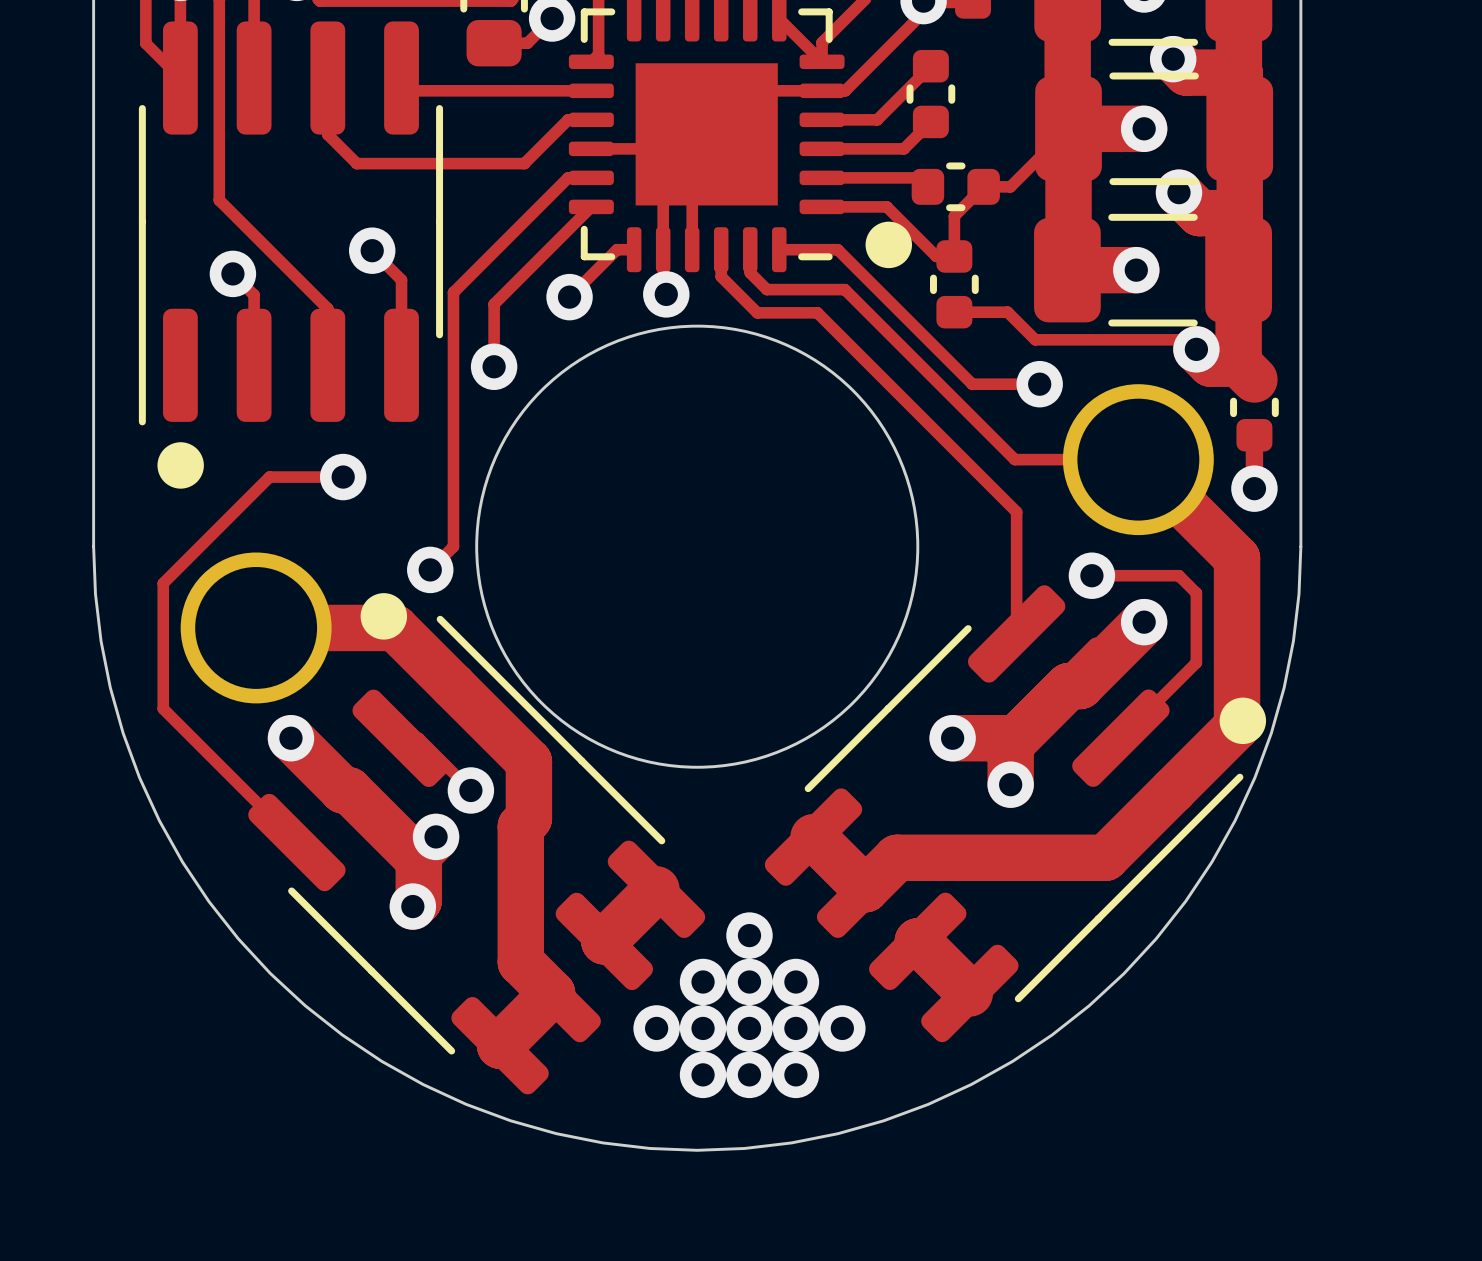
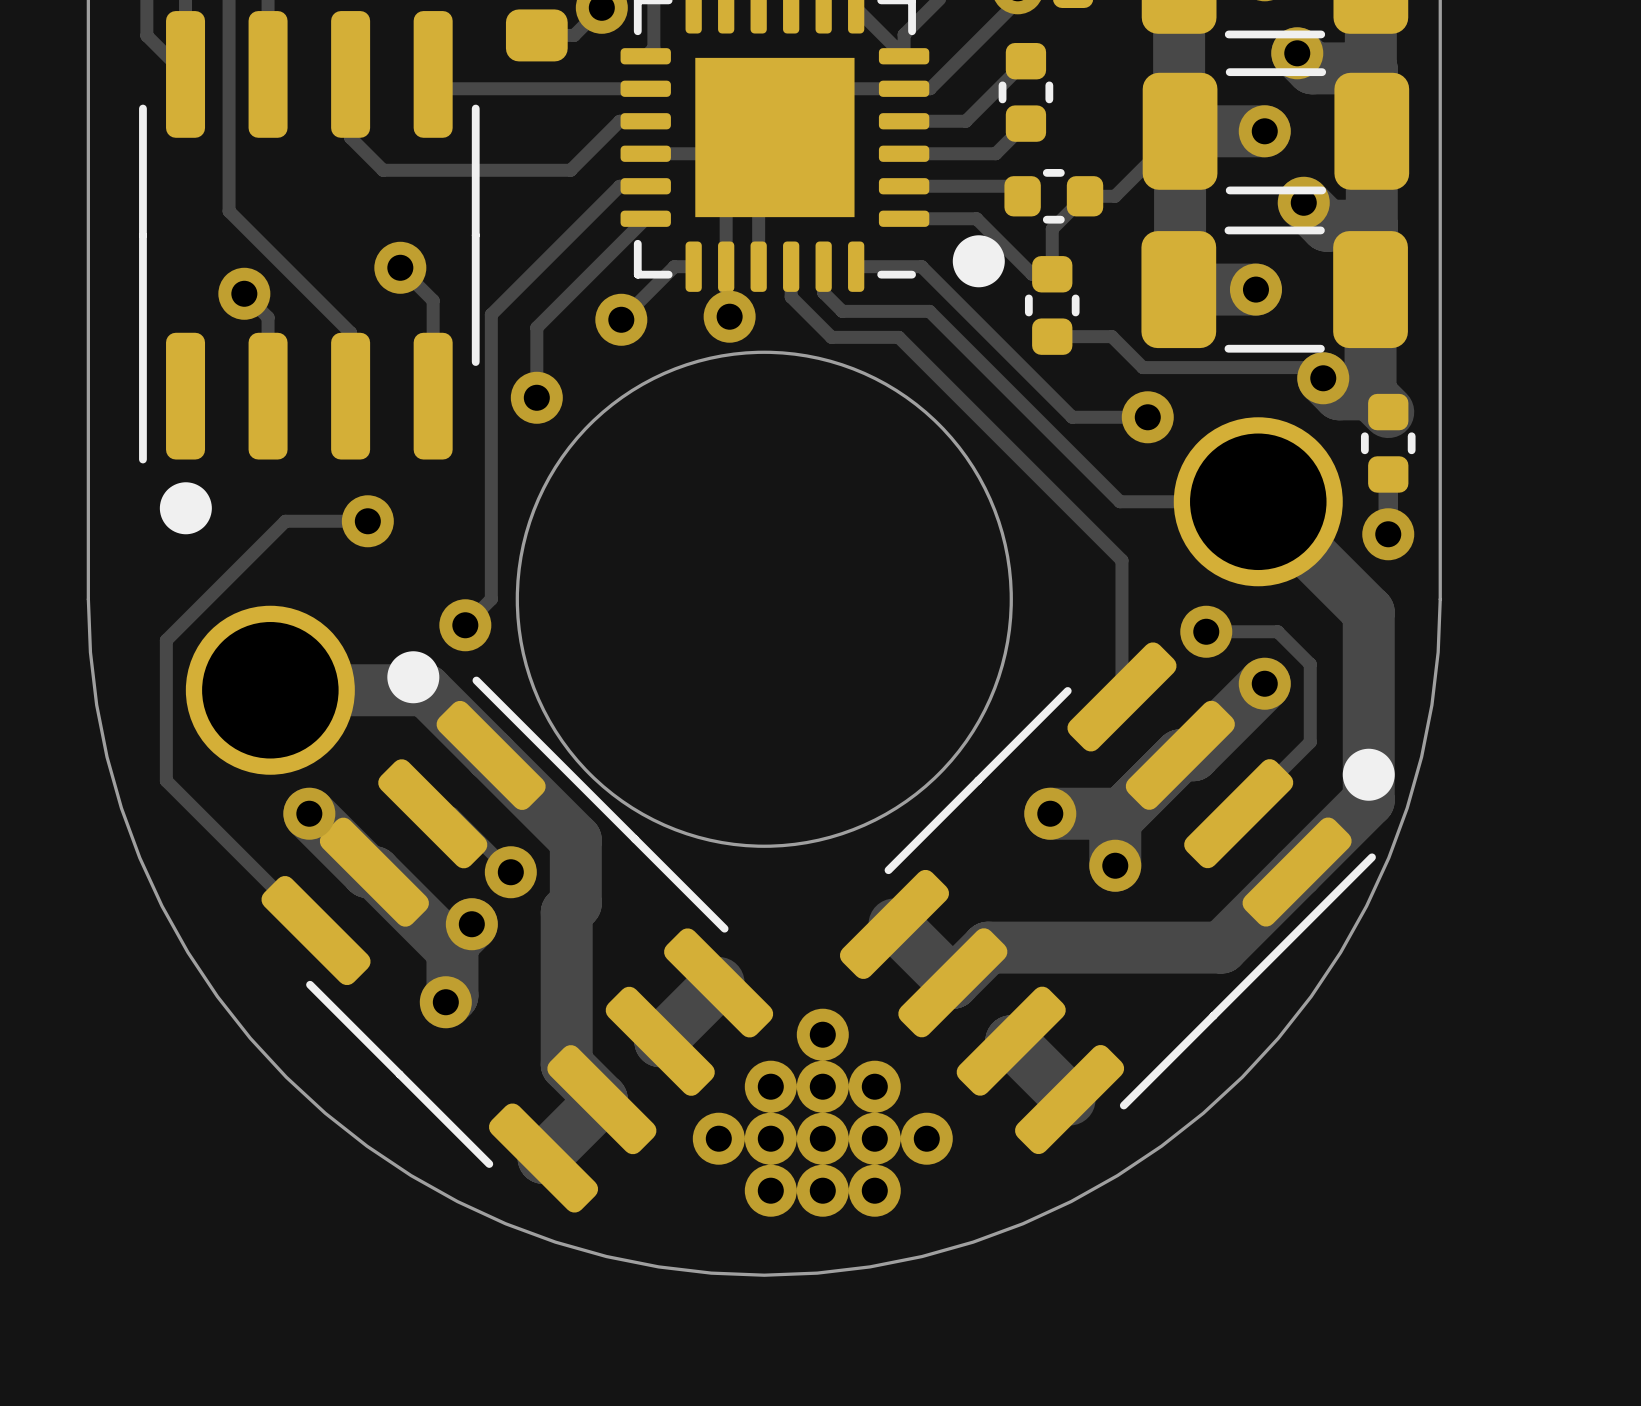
track: (1155, 575) (1178, 575) (1196, 593) (1196, 662) (1184, 674) -> (1277, 631) (1310, 664) (1310, 742)
drawing position: (1242, 720) -> (1368, 774)

